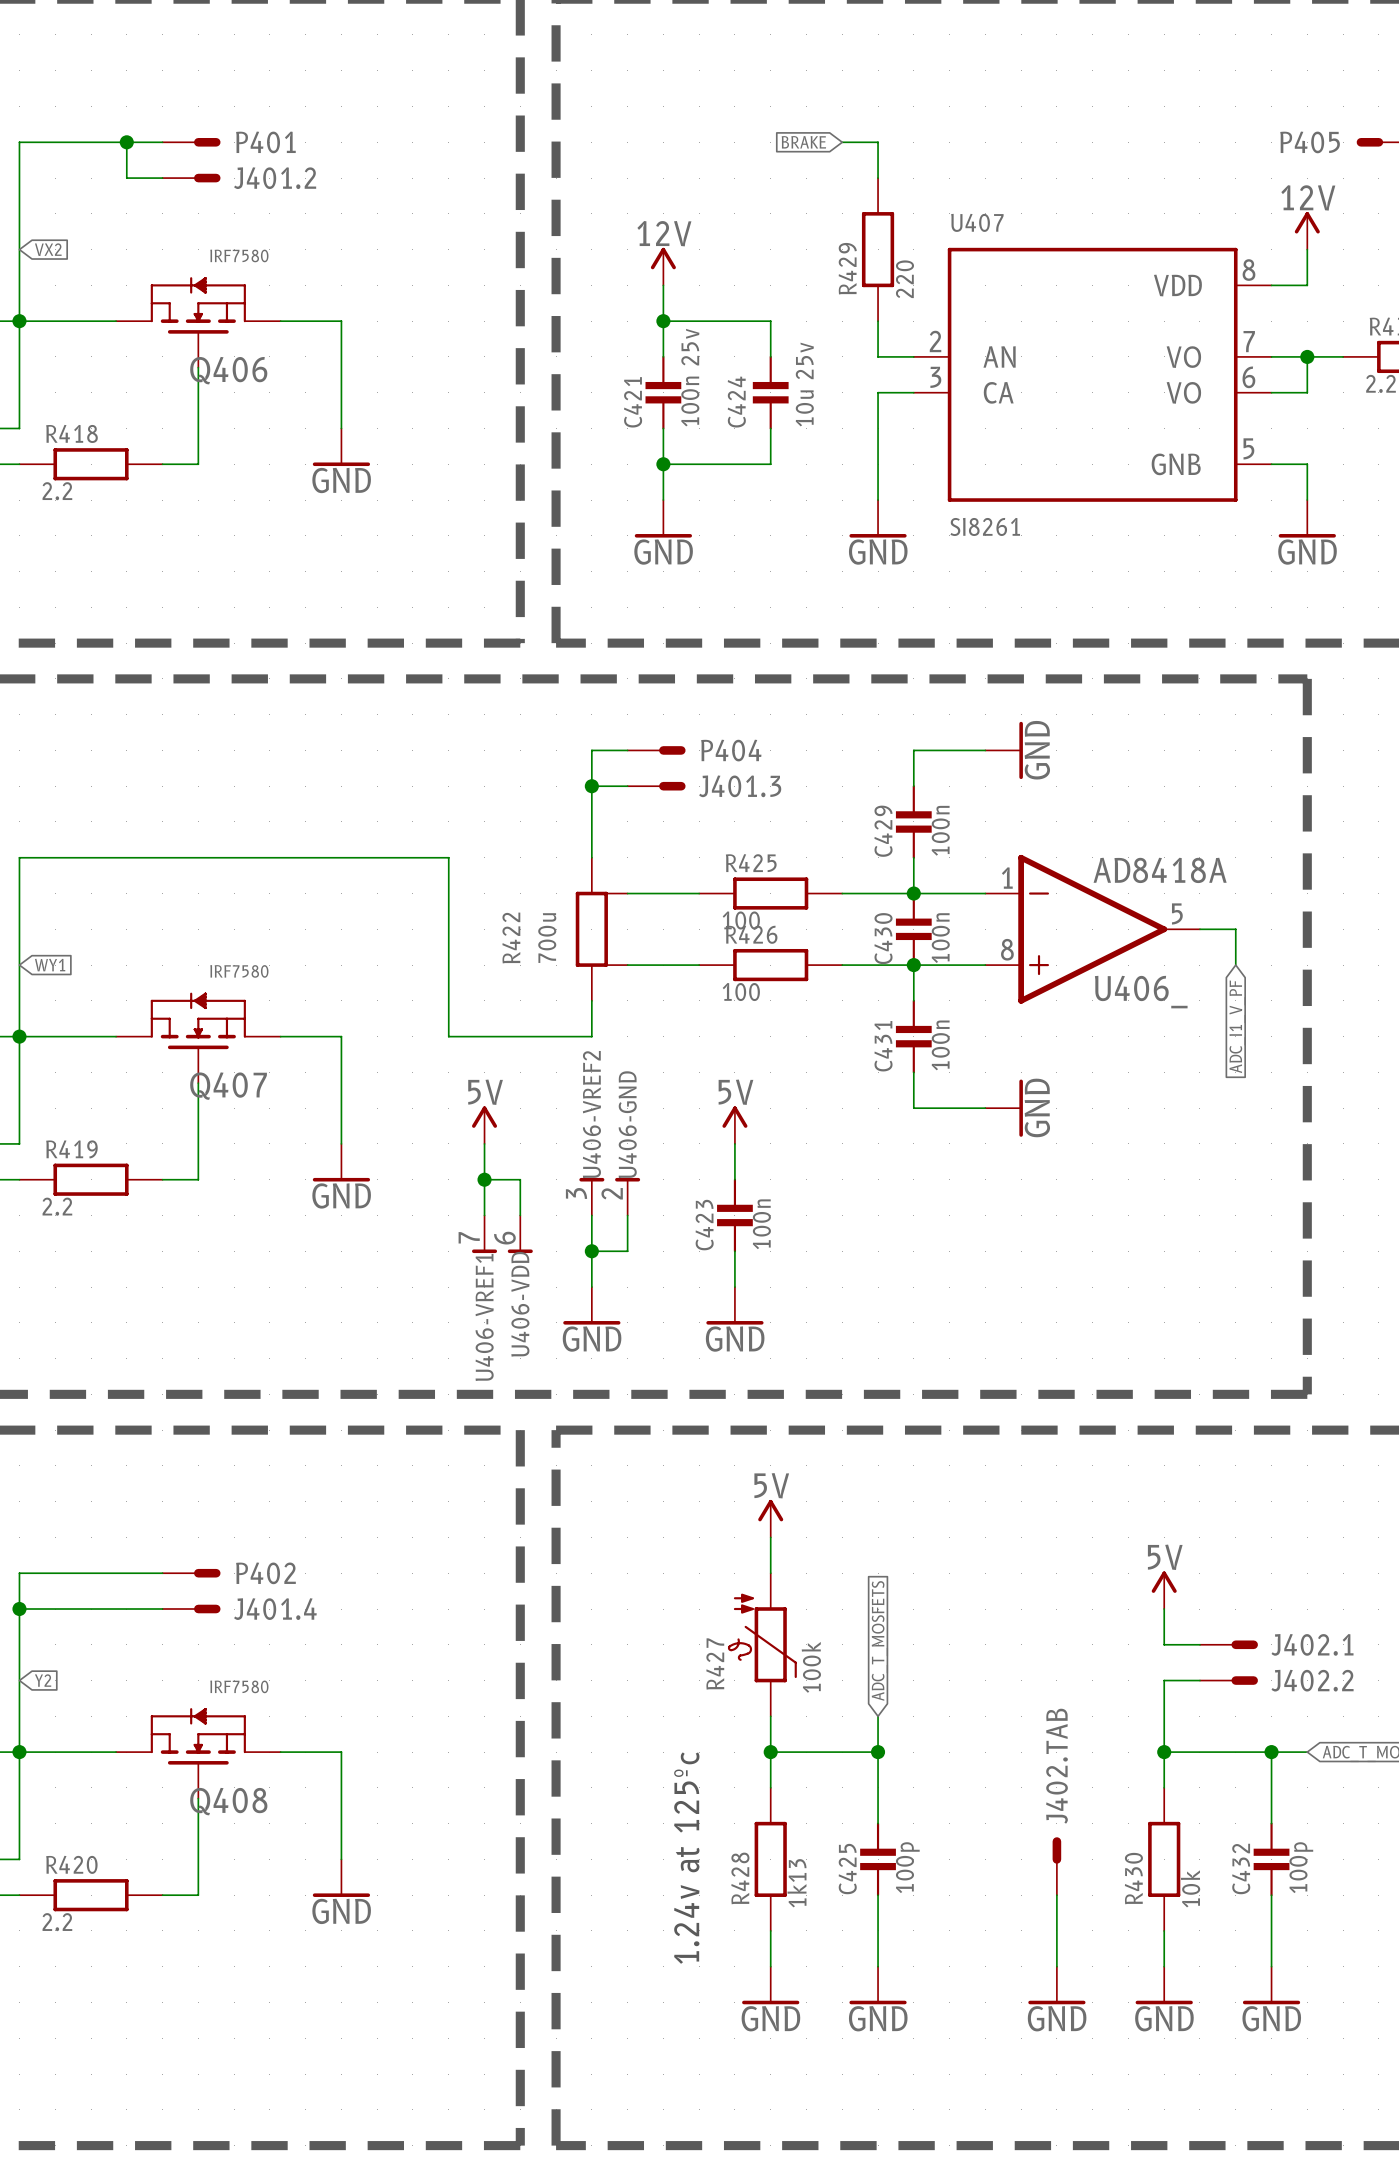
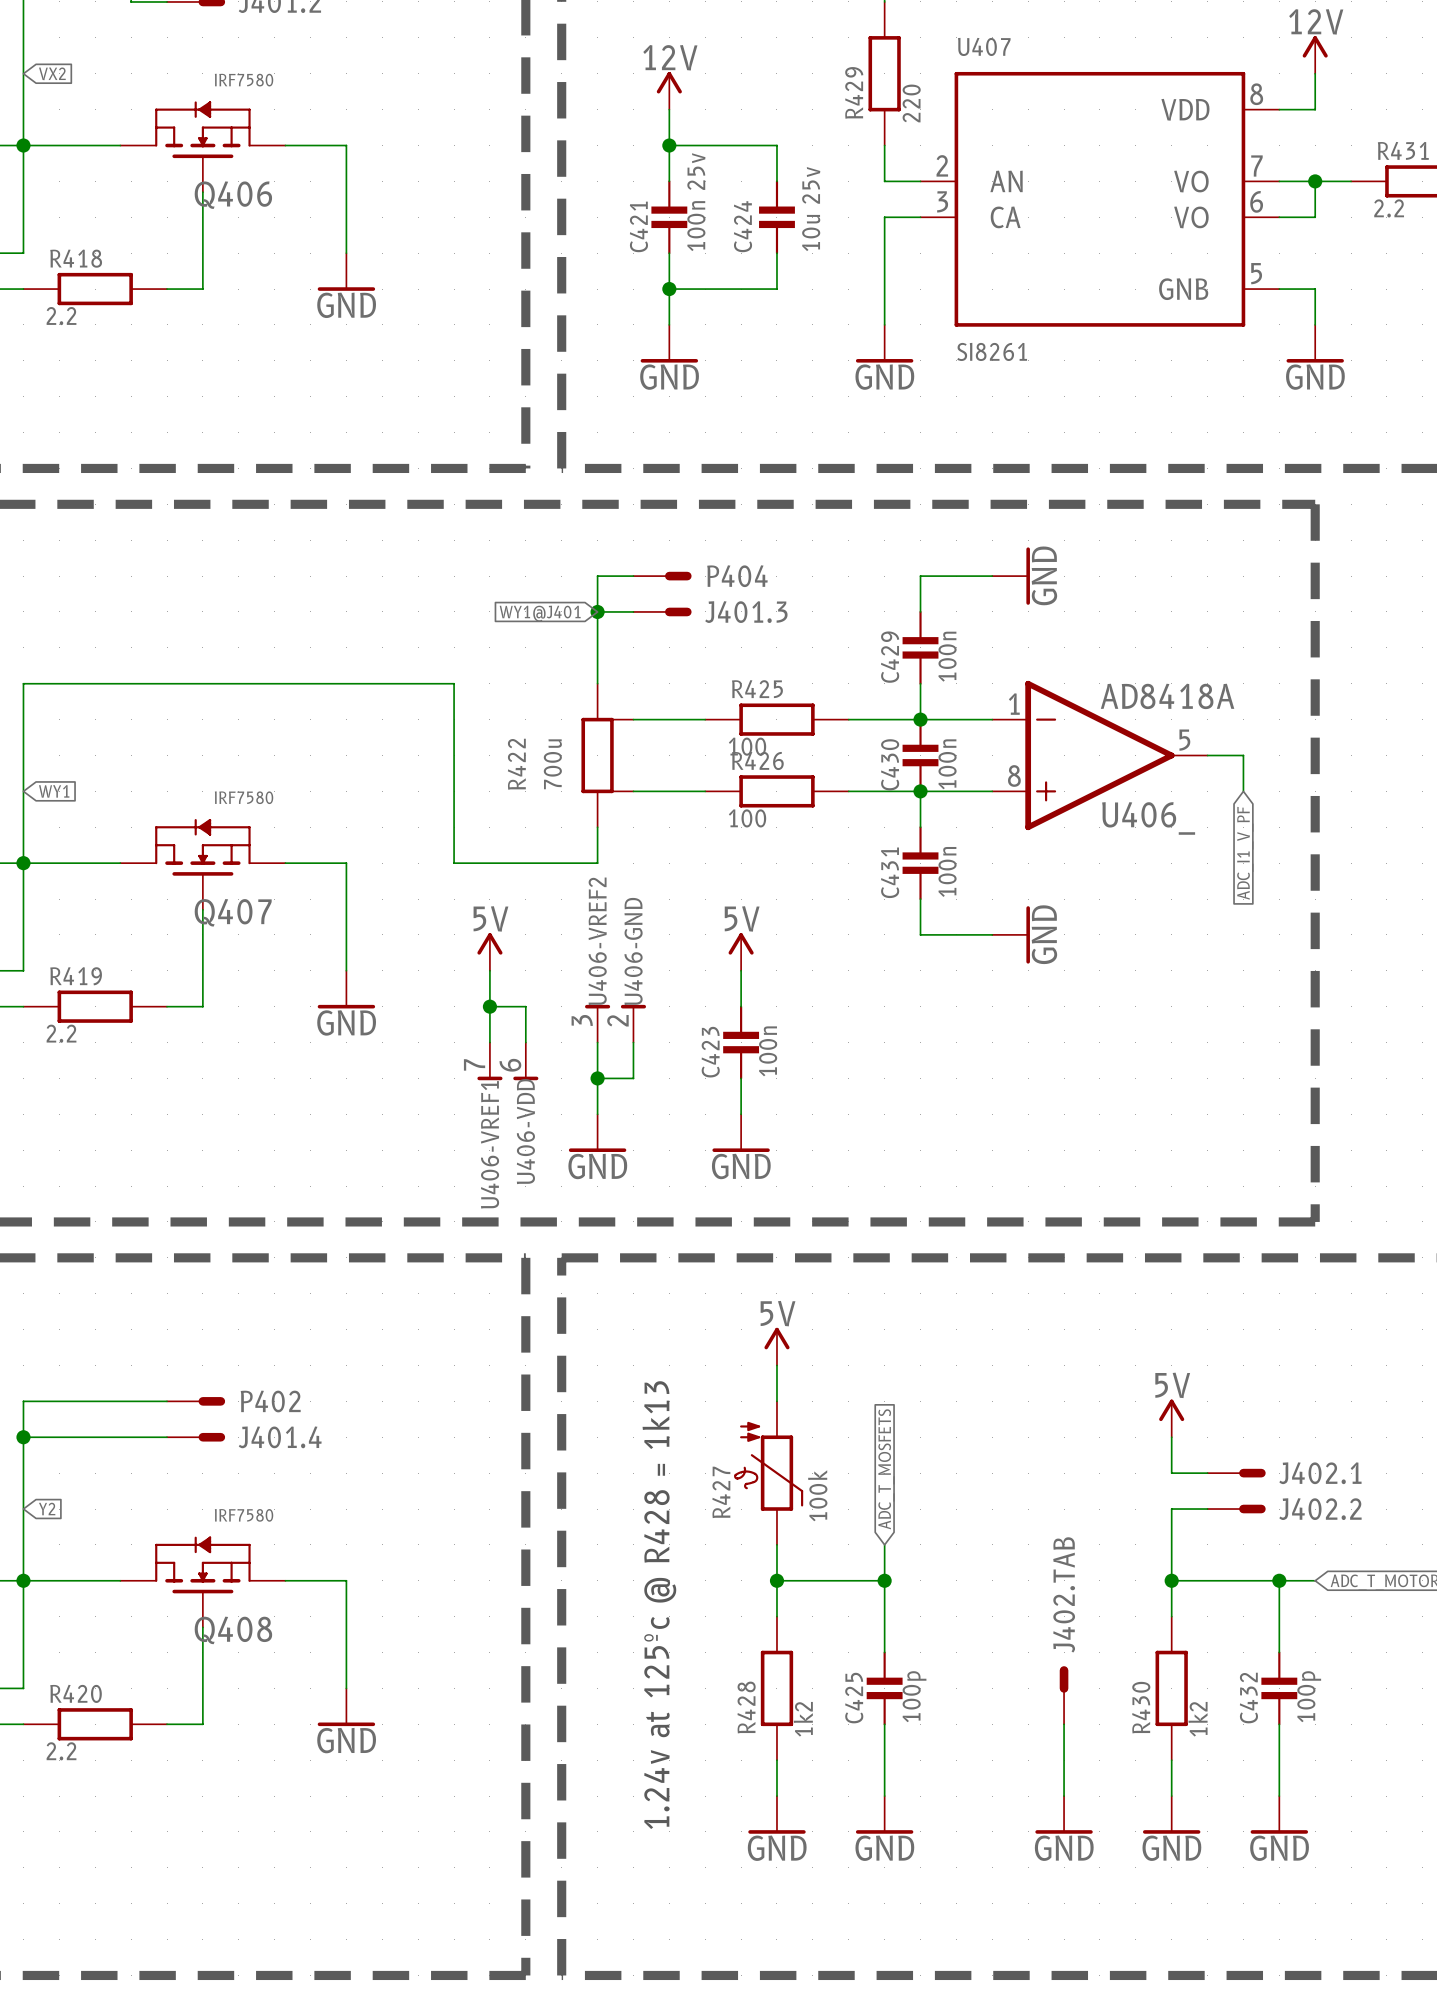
global label: none -> WY1@J401 (540, 613)
text: 1.24v at 125ºc (686, 1858) -> 1.24v at 125ºc @ R428 = 1k13 (659, 1605)
R428 value: 1k13 (796, 1883) -> 1k2 (803, 1719)
R430 value: 10k (1190, 1888) -> 1k2 (1198, 1719)

